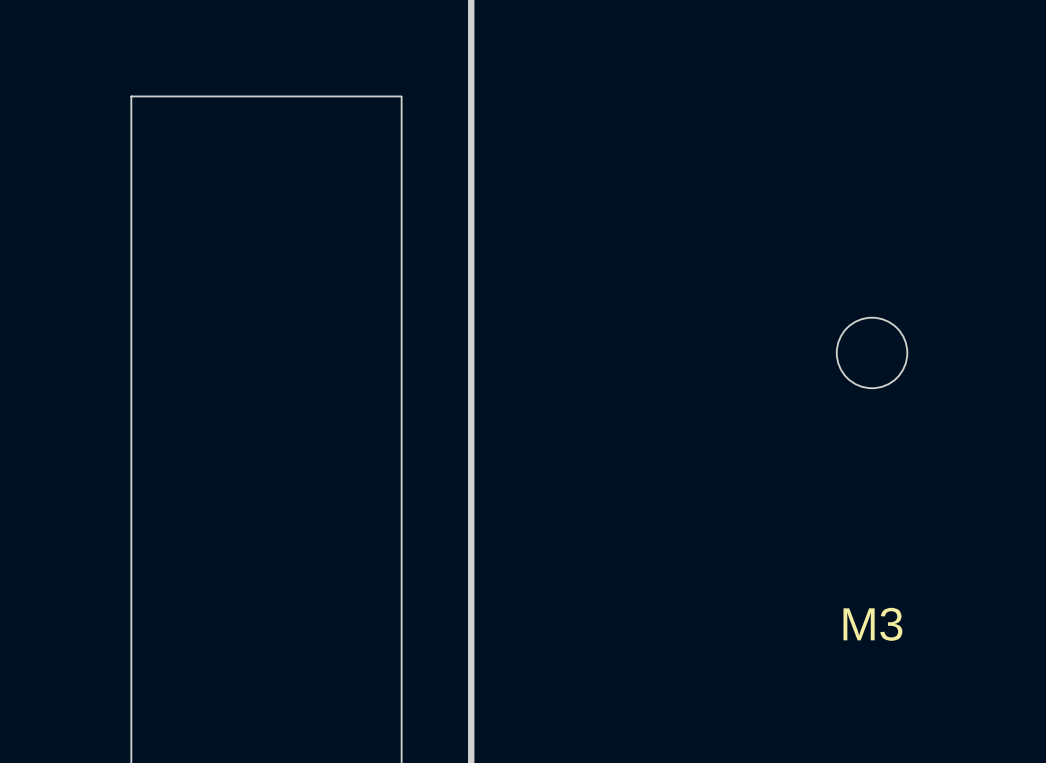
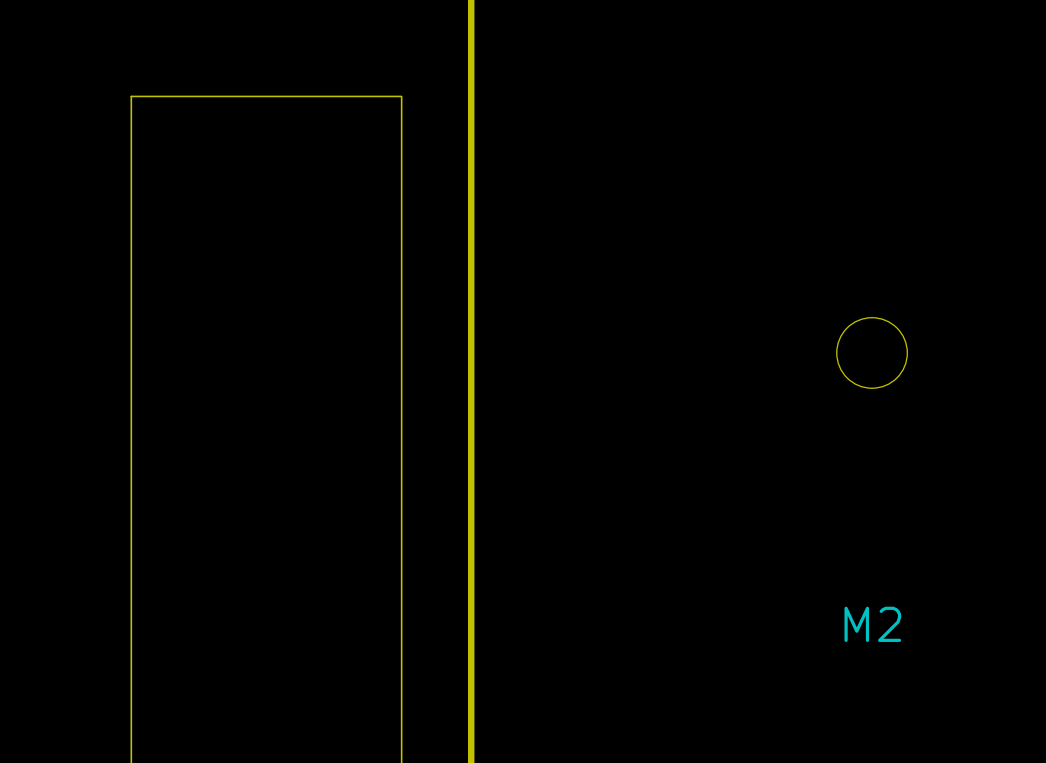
M3 name: M3 (872, 624) -> M2 (872, 624)

